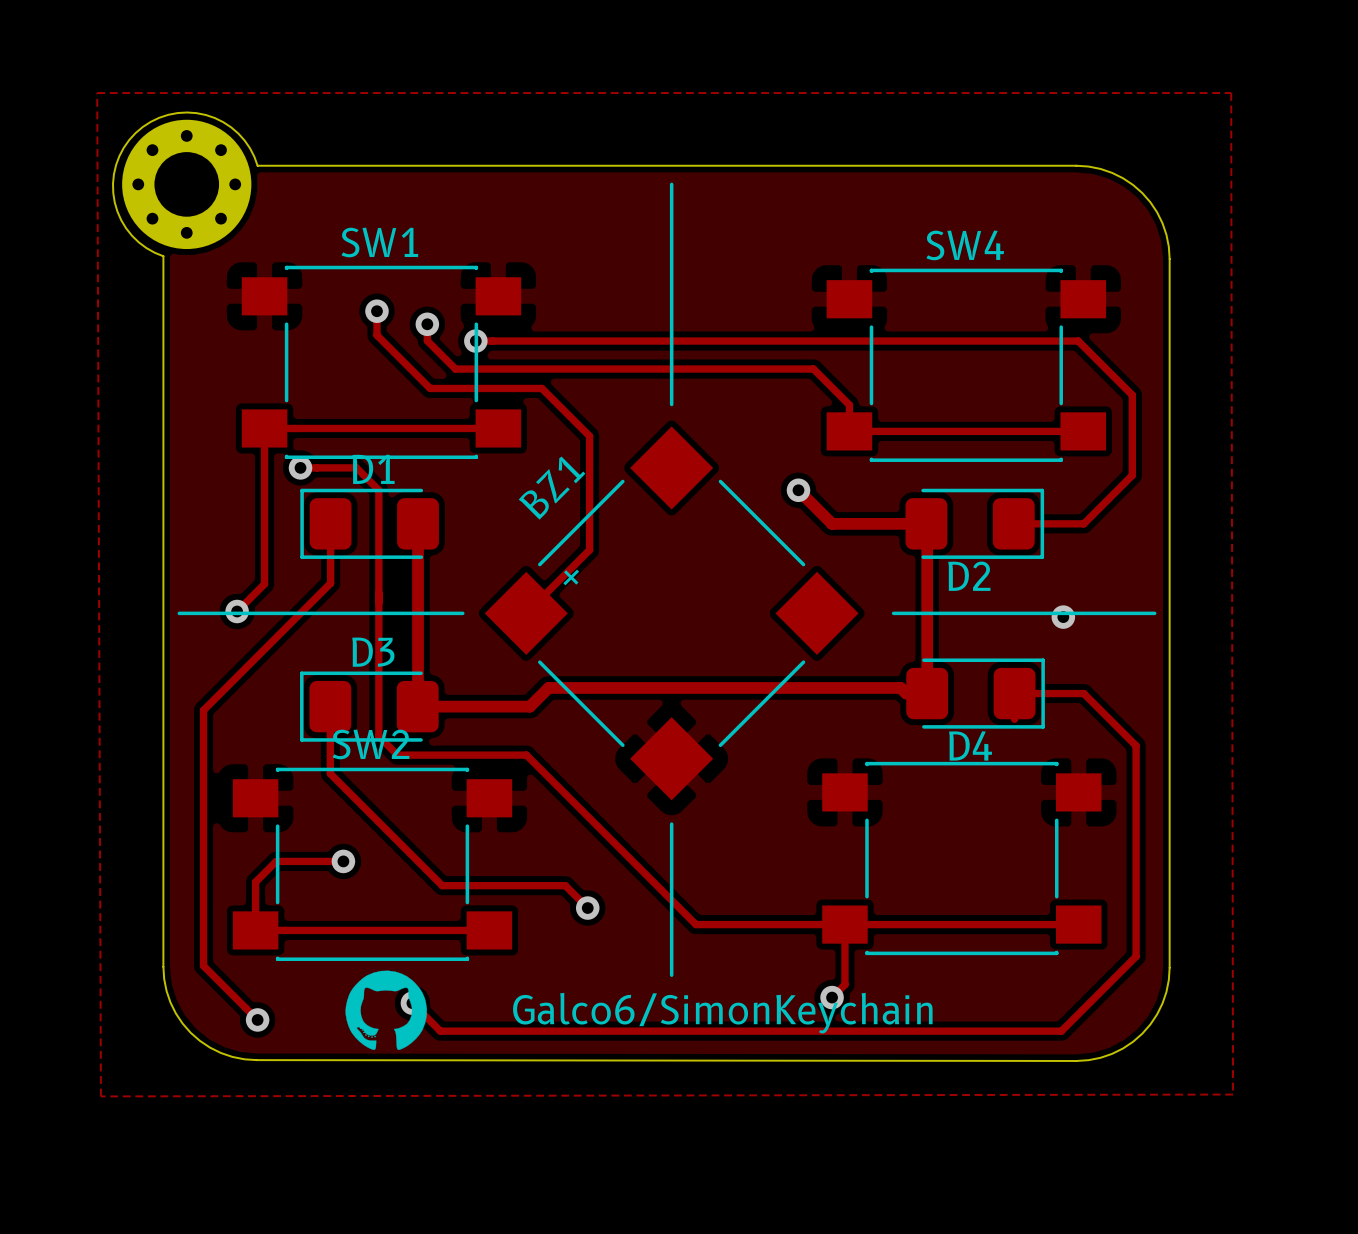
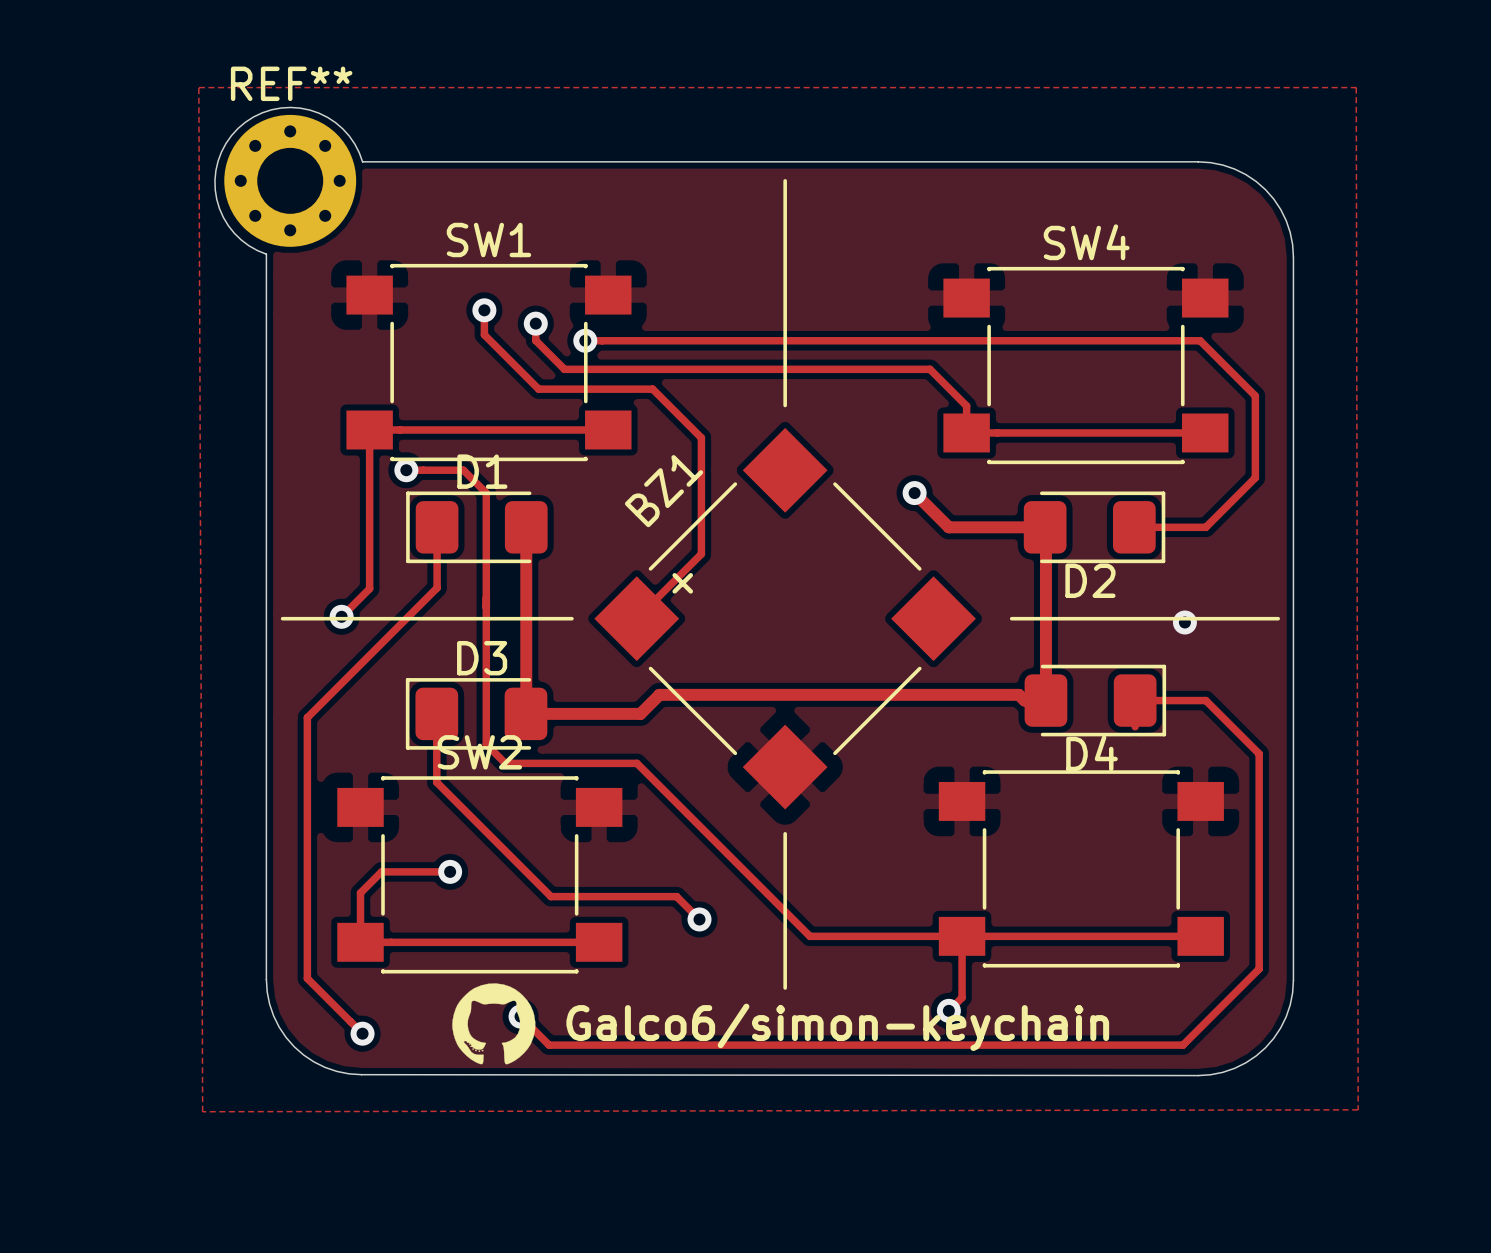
REF** name: none -> REF** (291, 83)
text: Galco6/SimonKeychain (722, 1013) -> Galco6/simon-keychain (837, 1027)

